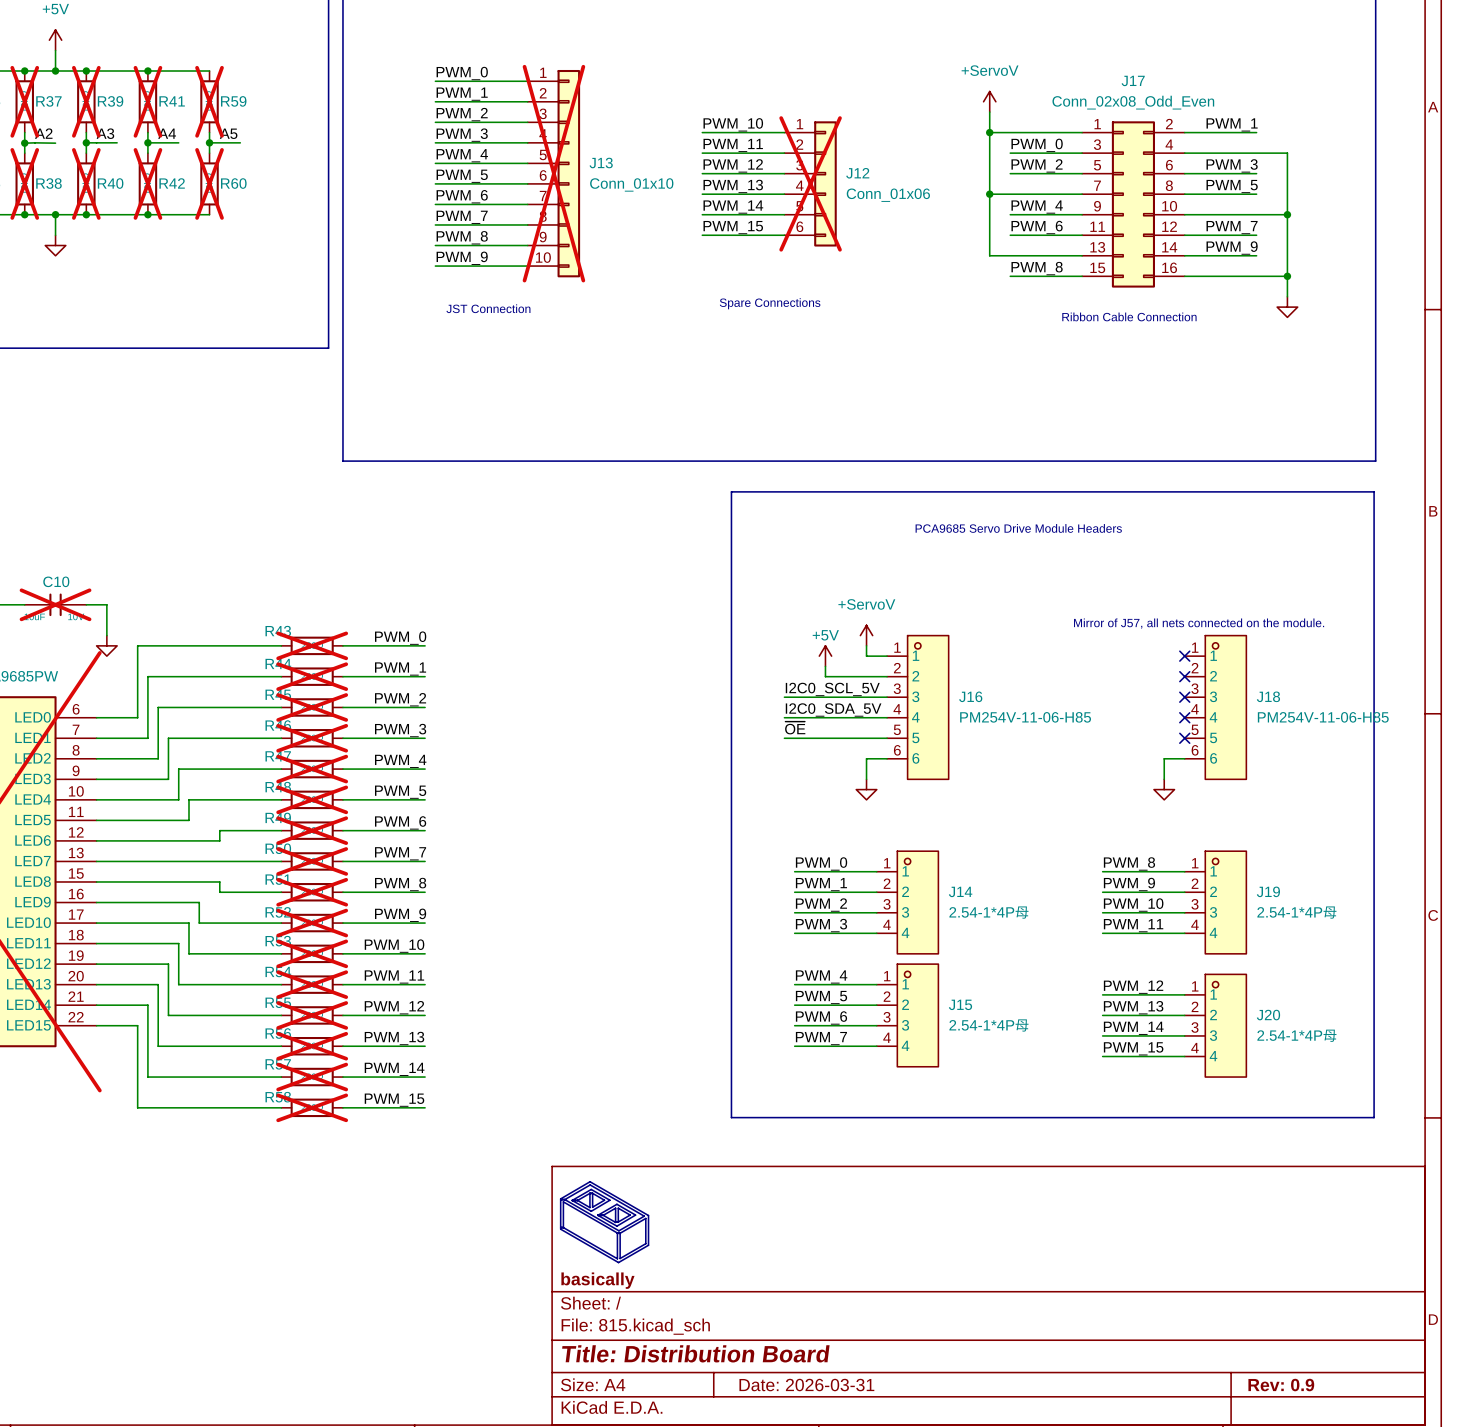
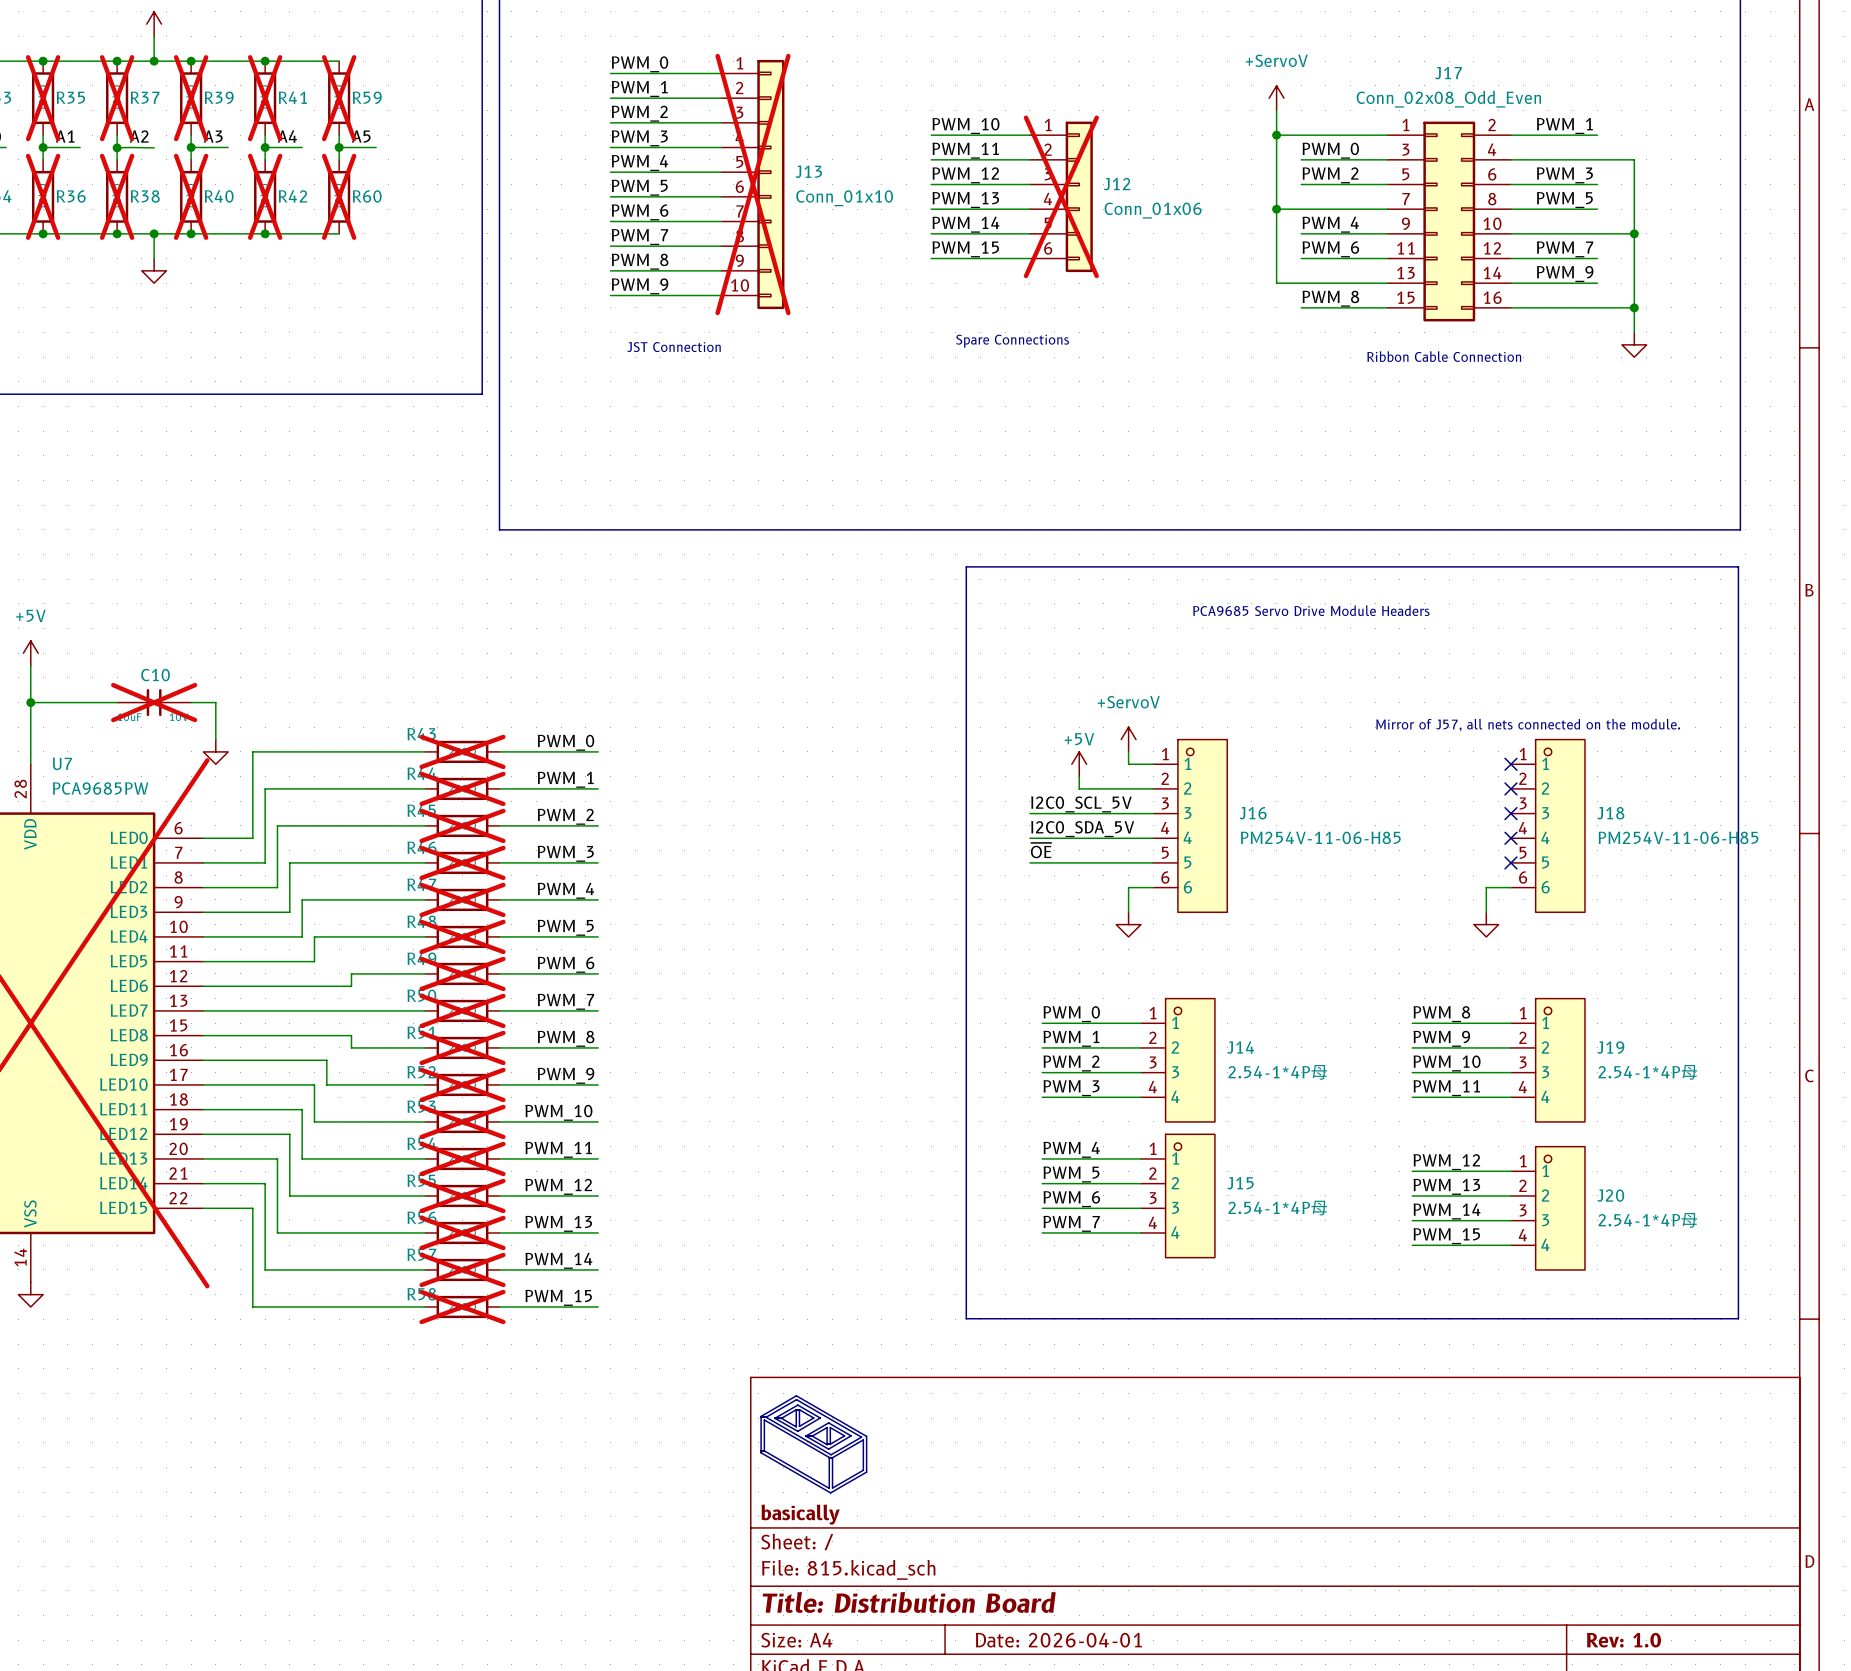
title block: Date: 2026-03-31 (806, 1385) -> Date: 2026-04-01 (1058, 1640)
title block: Rev: 0.9 (1281, 1385) -> Rev: 1.0 (1623, 1640)

